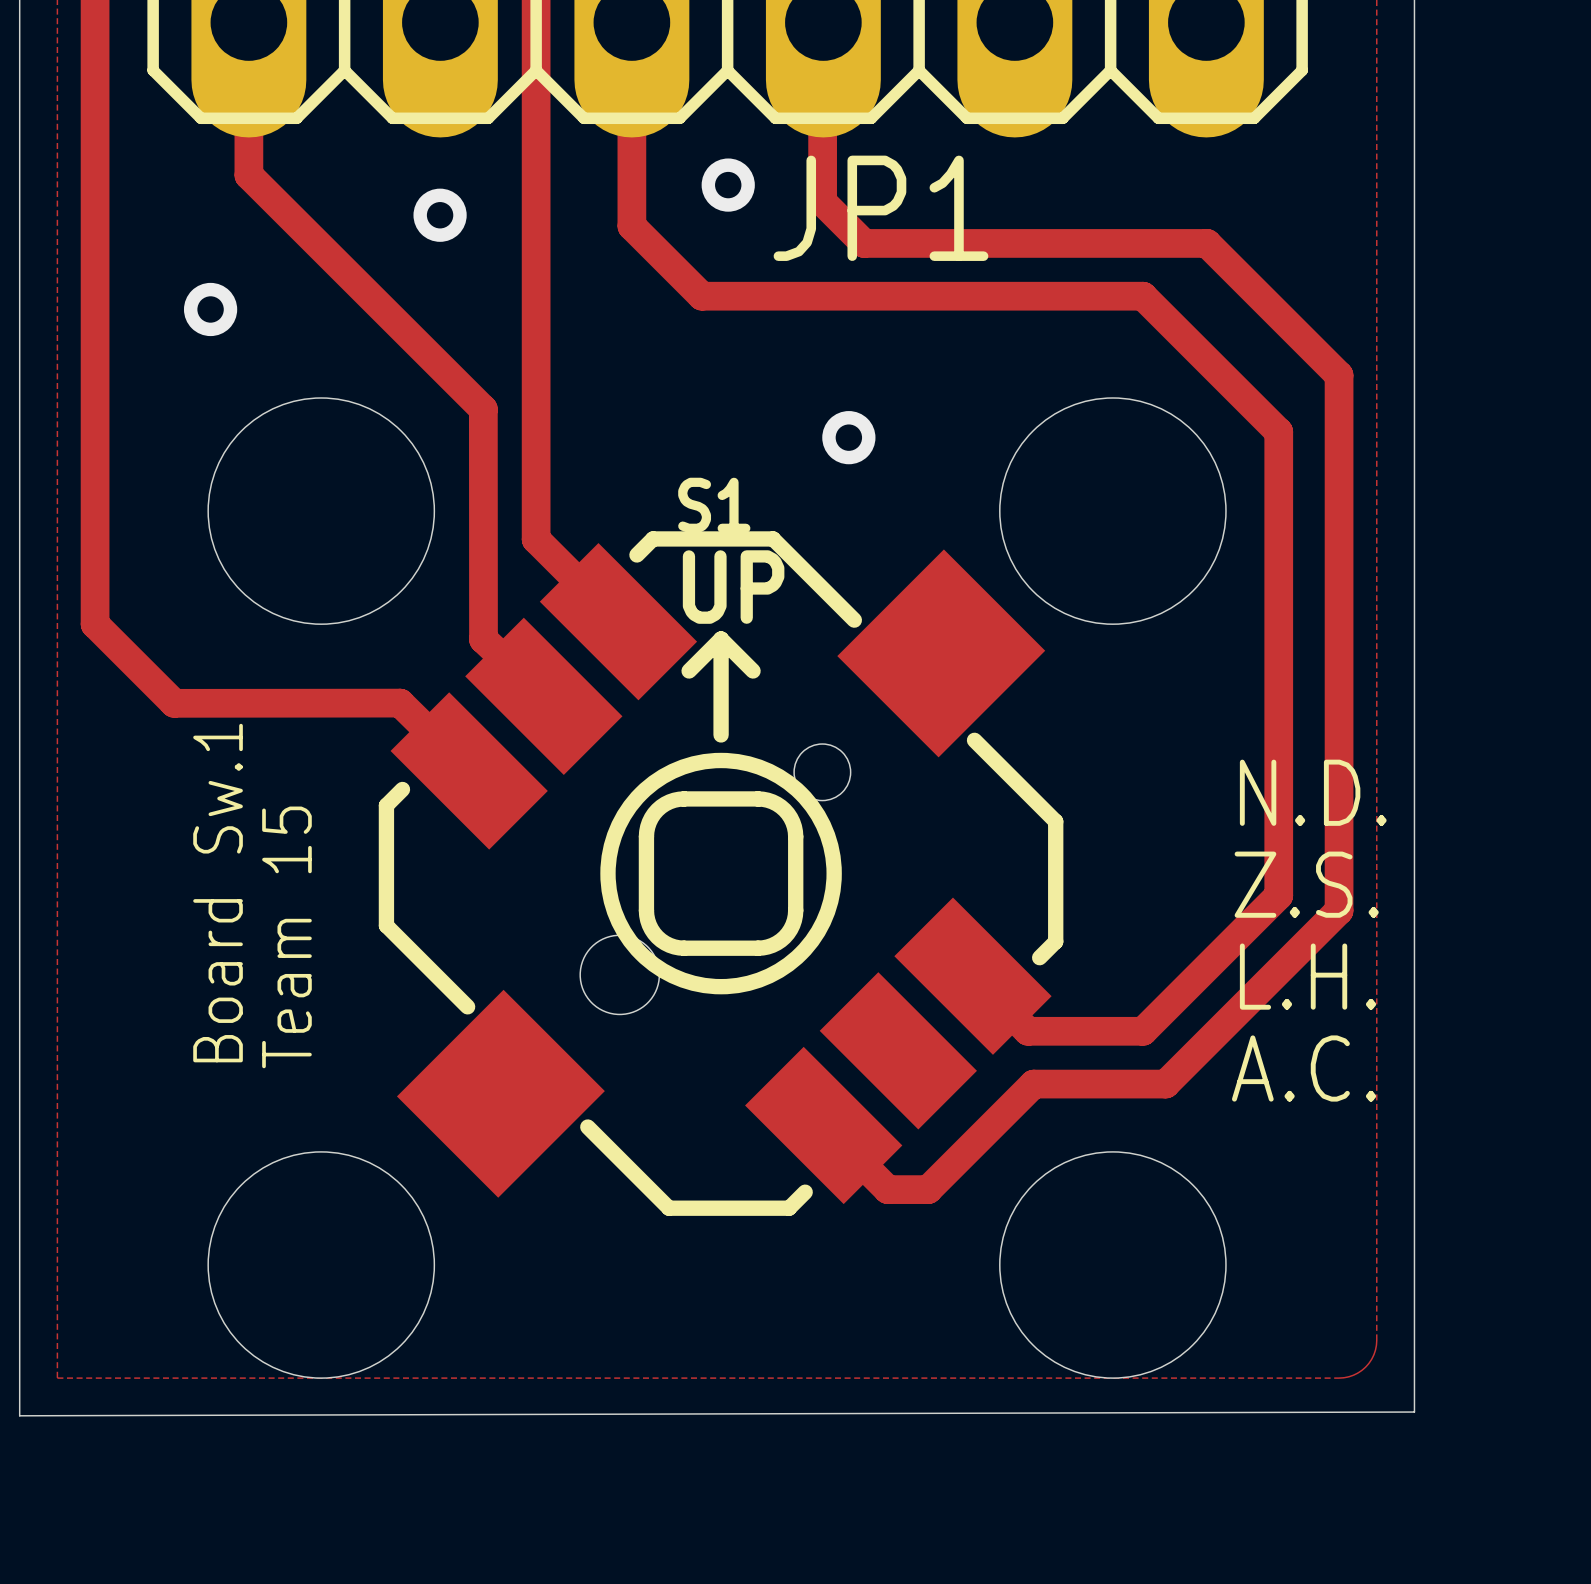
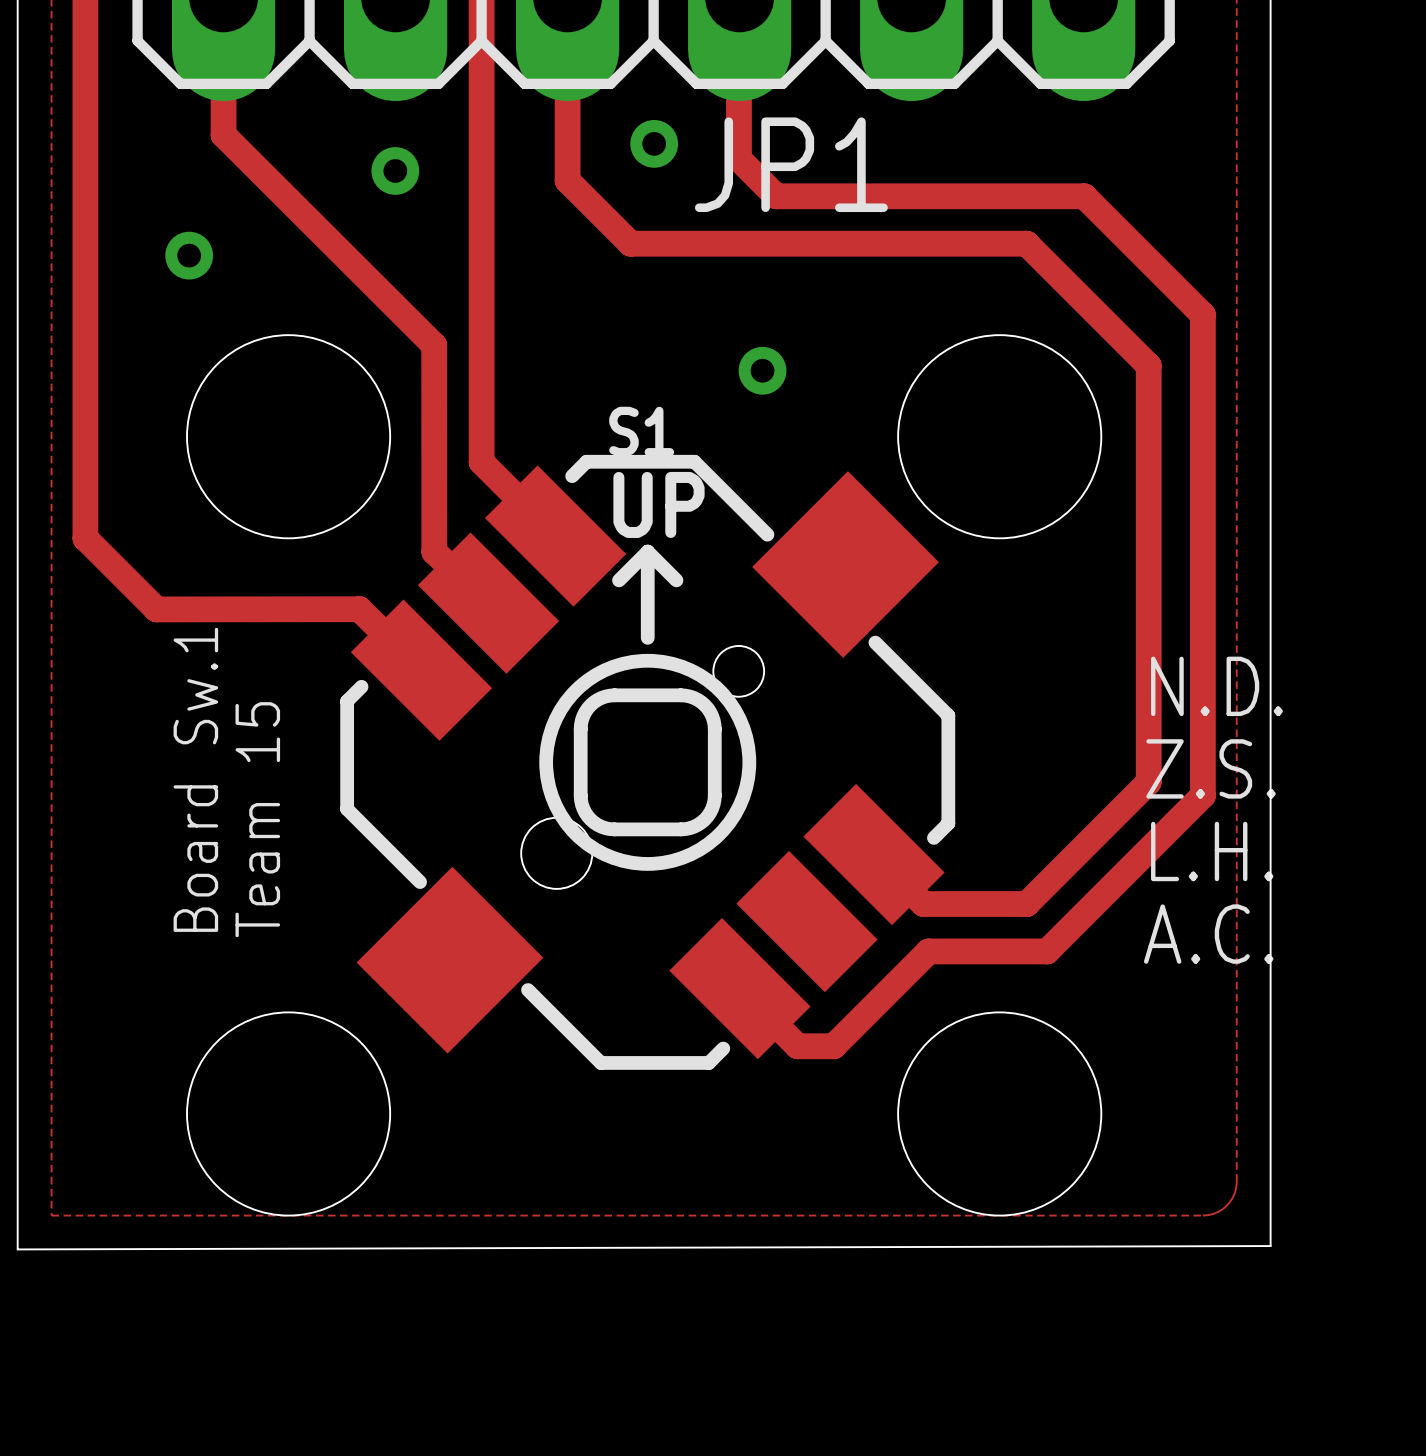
text position: N.D. (1313, 792) -> N.D. (1216, 686)
text position: Z.S. (1306, 884) -> Z.S. (1211, 768)
text position: L.H. (1307, 976) -> L.H. (1212, 851)
text position: A.C. (1304, 1068) -> A.C. (1208, 934)

